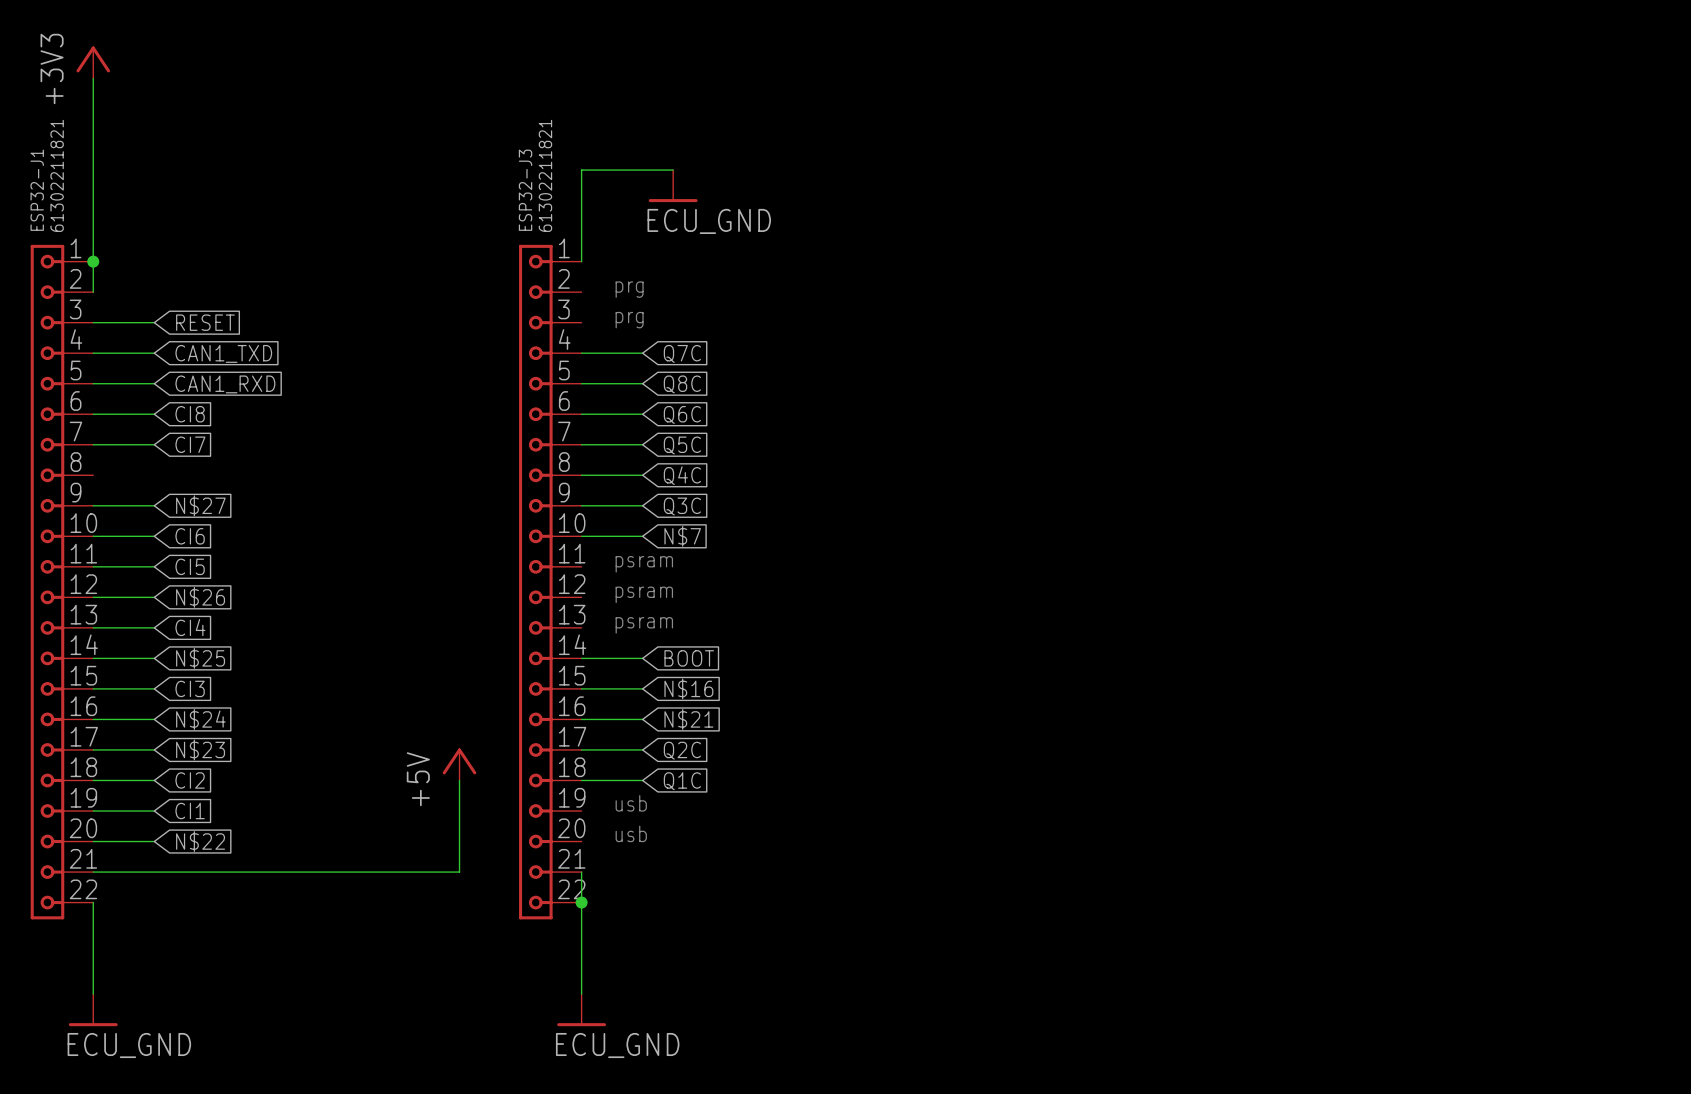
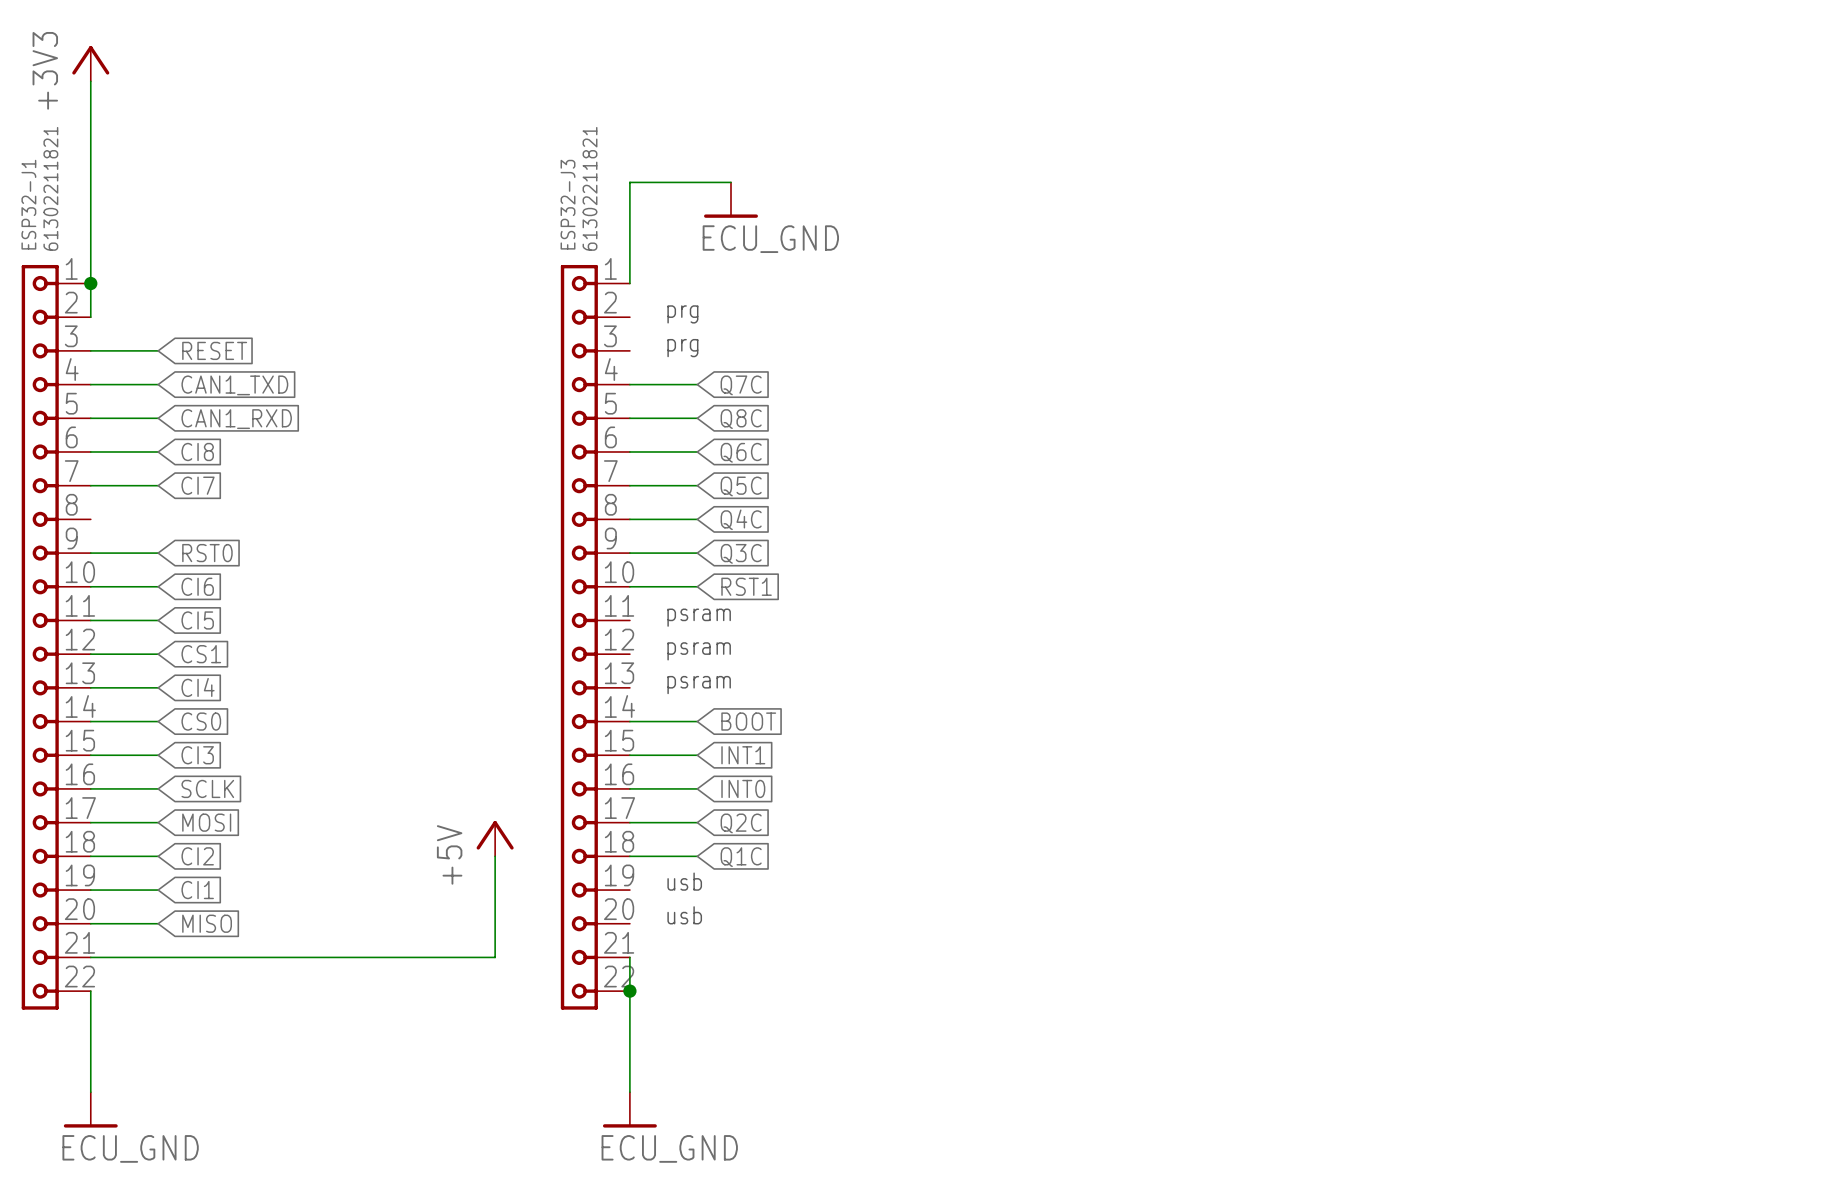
global label: N$27 (200, 505) -> RST0 (207, 553)
global label: N$7 (682, 536) -> RST1 (746, 586)
global label: N$26 (200, 597) -> CS1 (201, 654)
global label: N$25 (200, 658) -> CS0 (201, 721)
global label: N$16 (688, 688) -> INT1 (743, 755)
global label: N$24 (200, 719) -> SCLK (207, 788)
global label: N$21 (688, 719) -> INT0 (743, 788)
global label: N$23 (200, 749) -> MOSI (206, 822)
global label: N$22 (200, 841) -> MISO (207, 923)

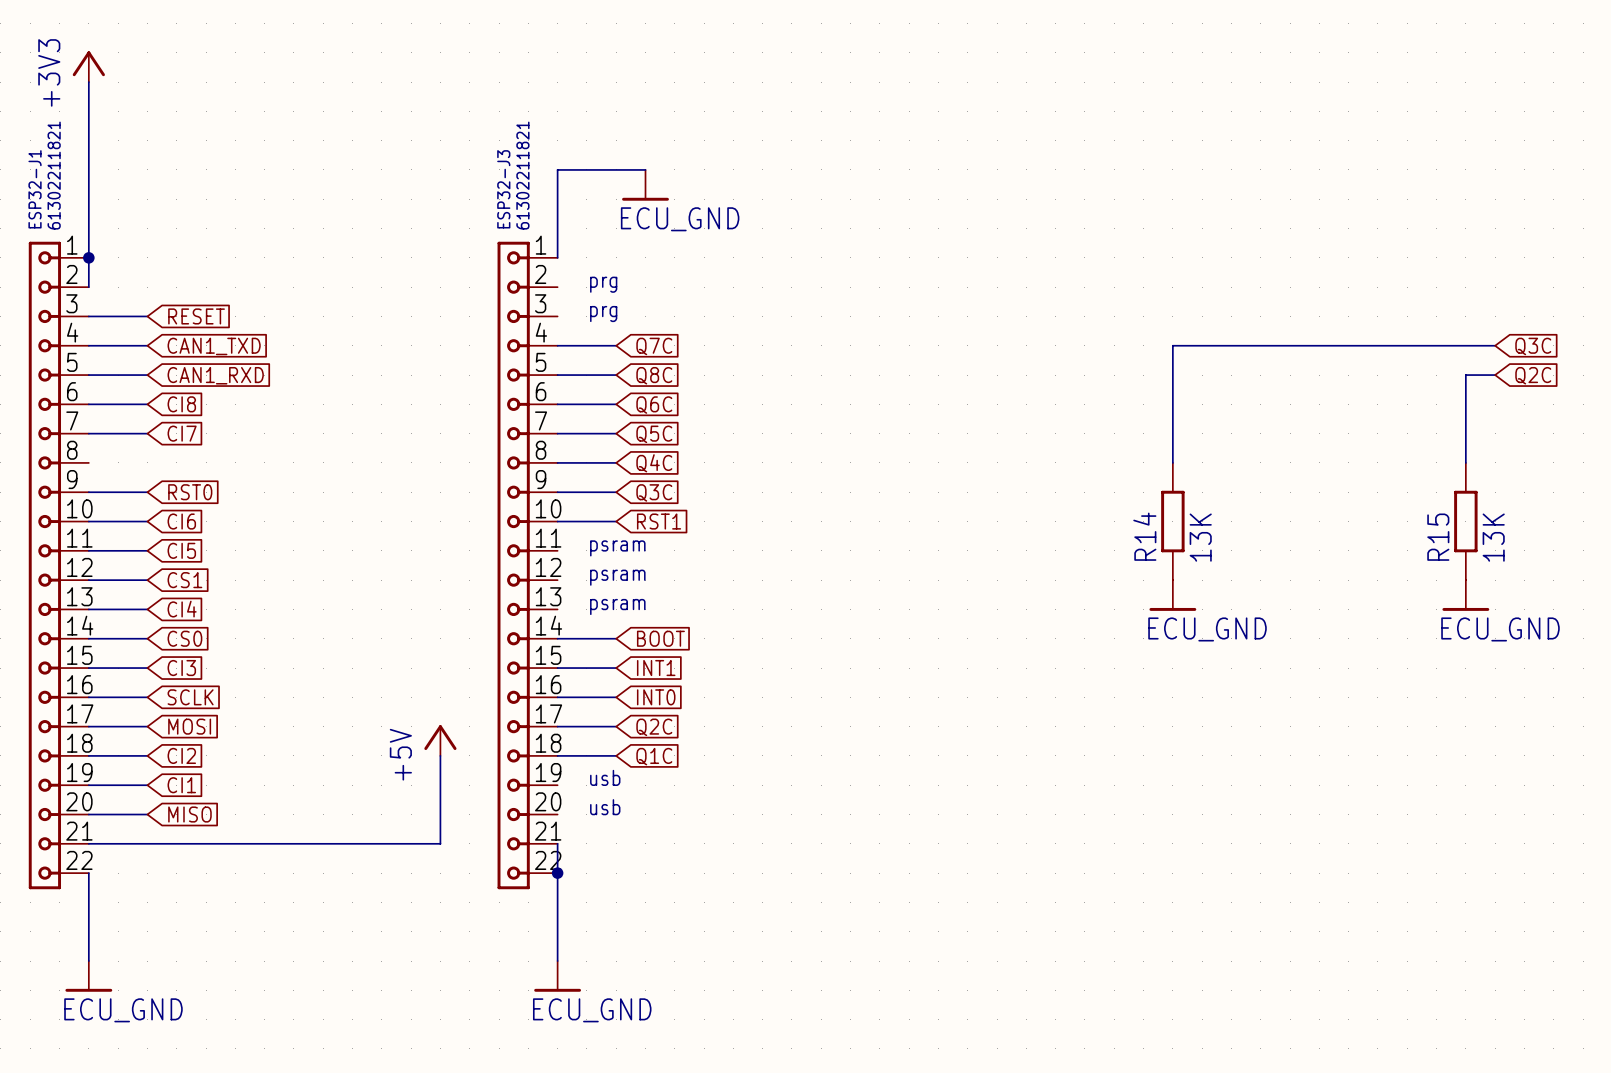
wire: none -> (1495, 345) (1172, 345) (1172, 462)
global label: none -> Q3C (1533, 346)
wire: none -> (1495, 375) (1465, 375) (1465, 462)
global label: none -> Q2C (1533, 375)
R14: none -> 13K (1172, 521)
R15: none -> 13K (1465, 521)
power symbol: none -> ECU_GND (1172, 595)
power symbol: none -> ECU_GND (1465, 595)

